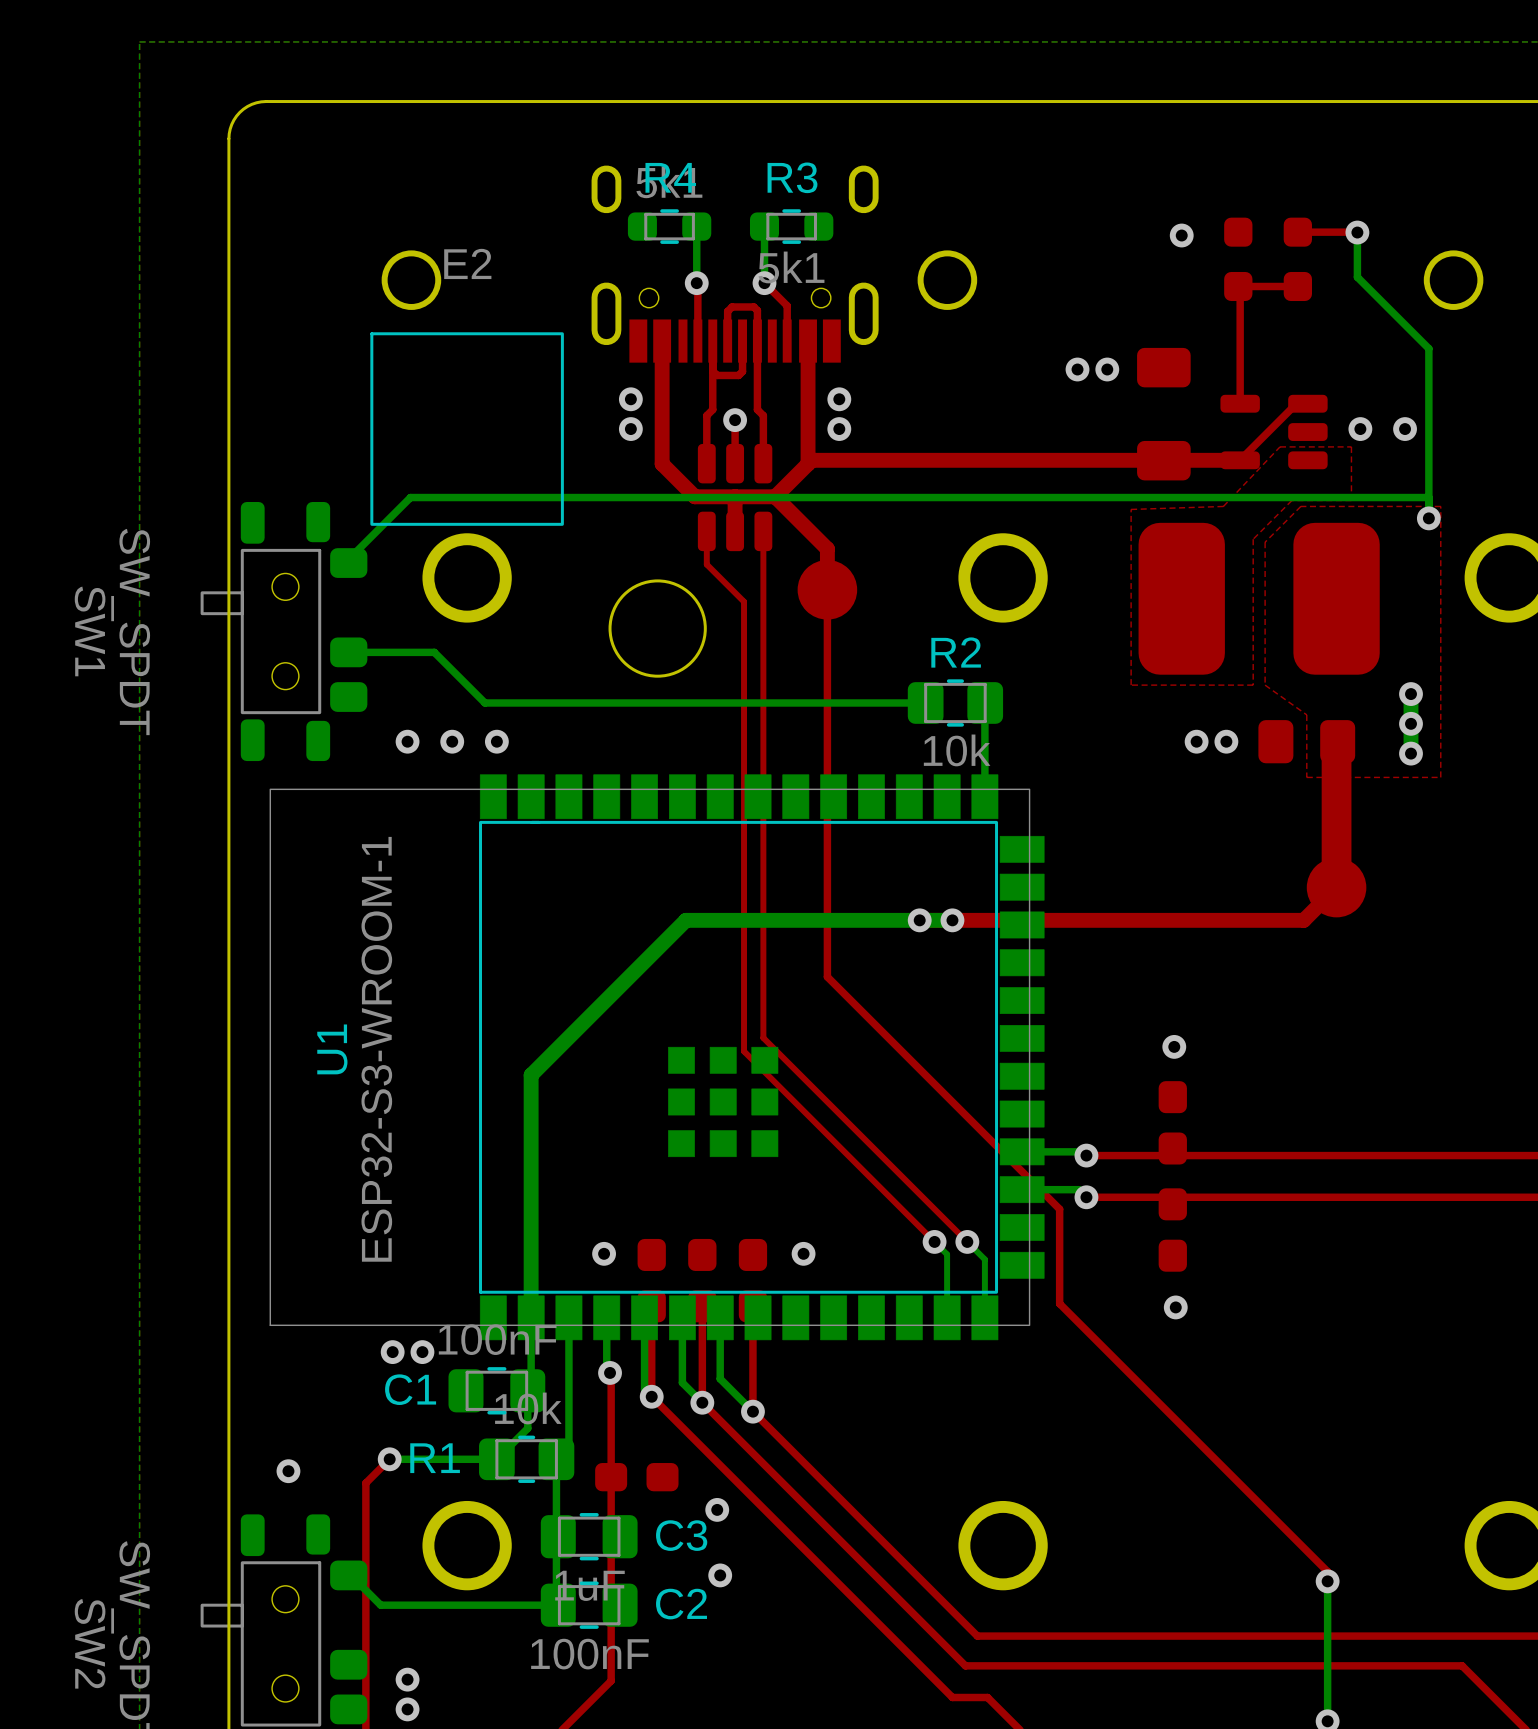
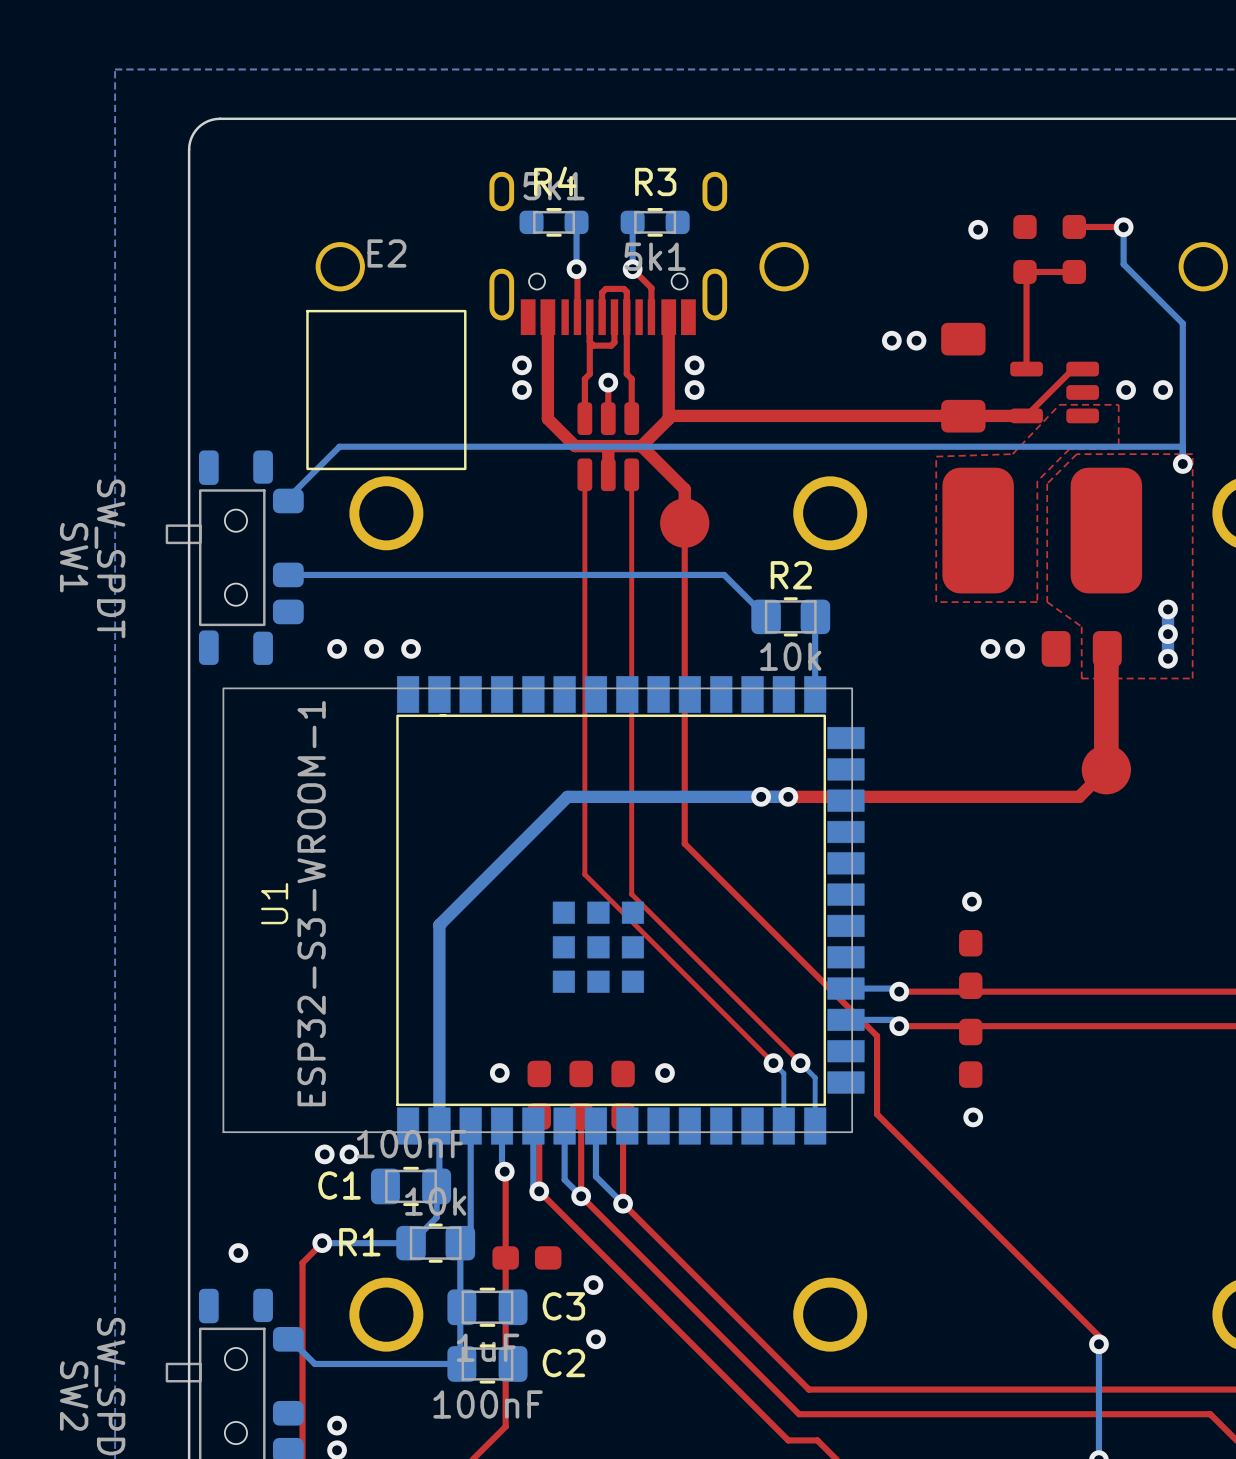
top track: (706, 564) (744, 601) (744, 1051) -> (584, 502) (584, 874) (615, 905)
round board edge: [608, 579, 707, 678] -> none
bottom track: (434, 652) (484, 702) (925, 702) -> (359, 574) (724, 574) (766, 616)

